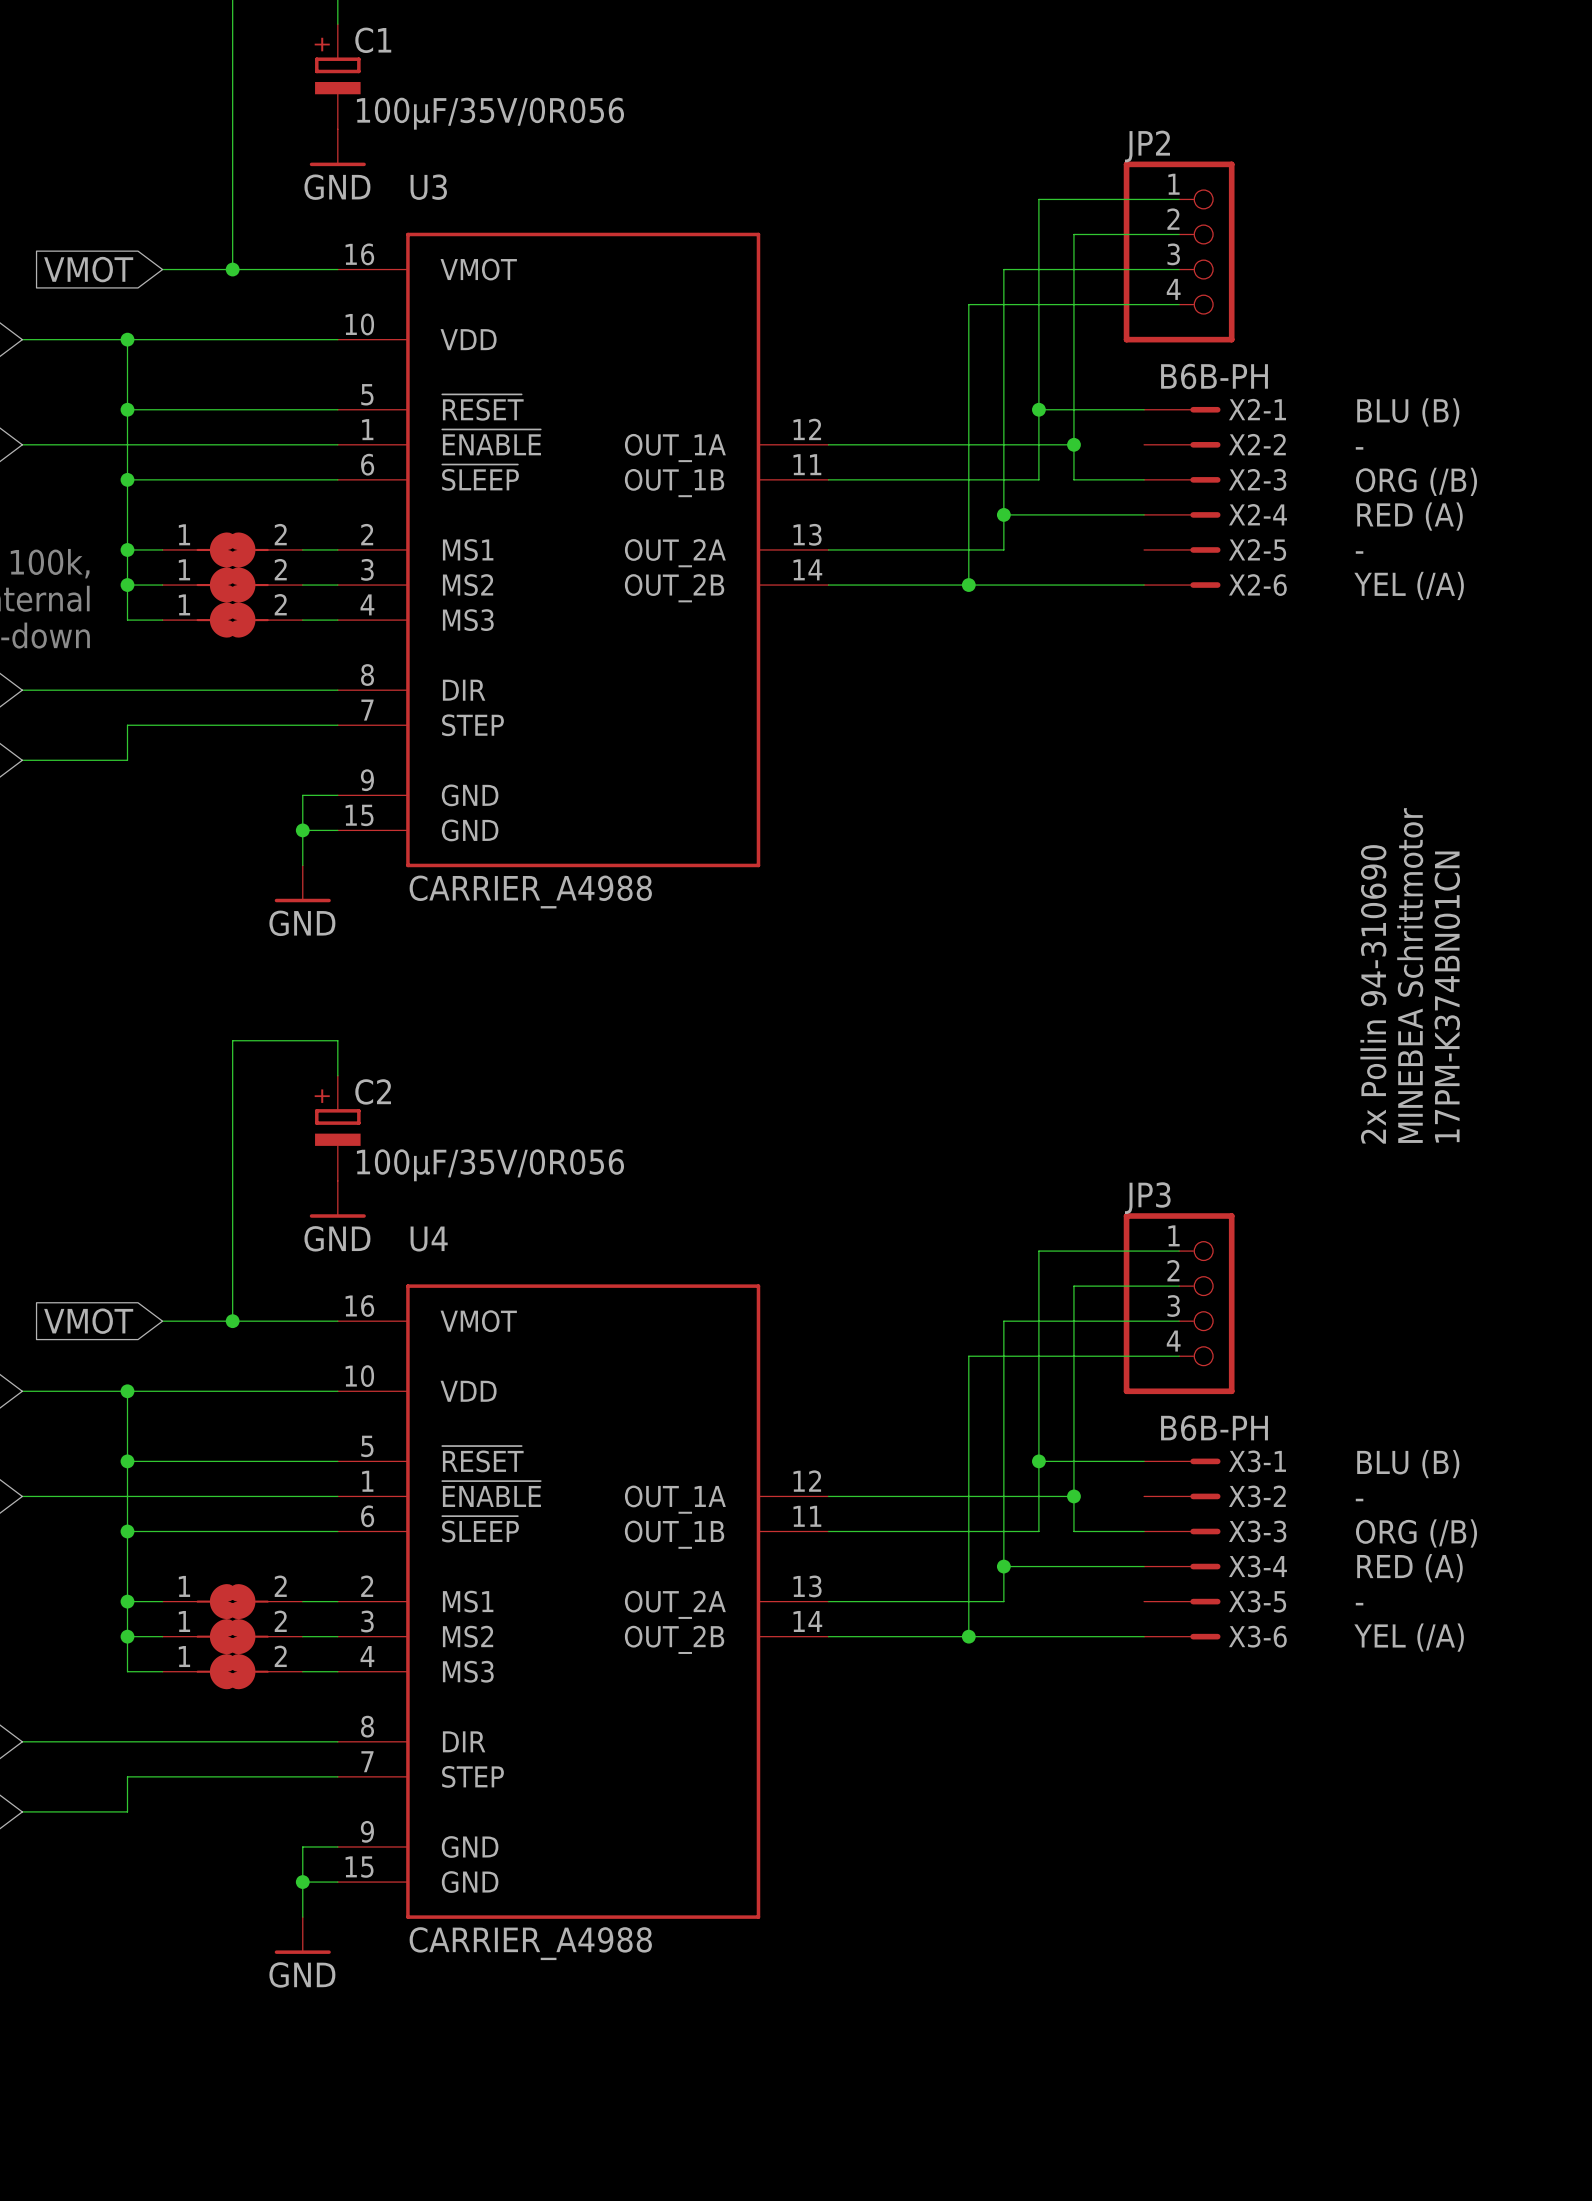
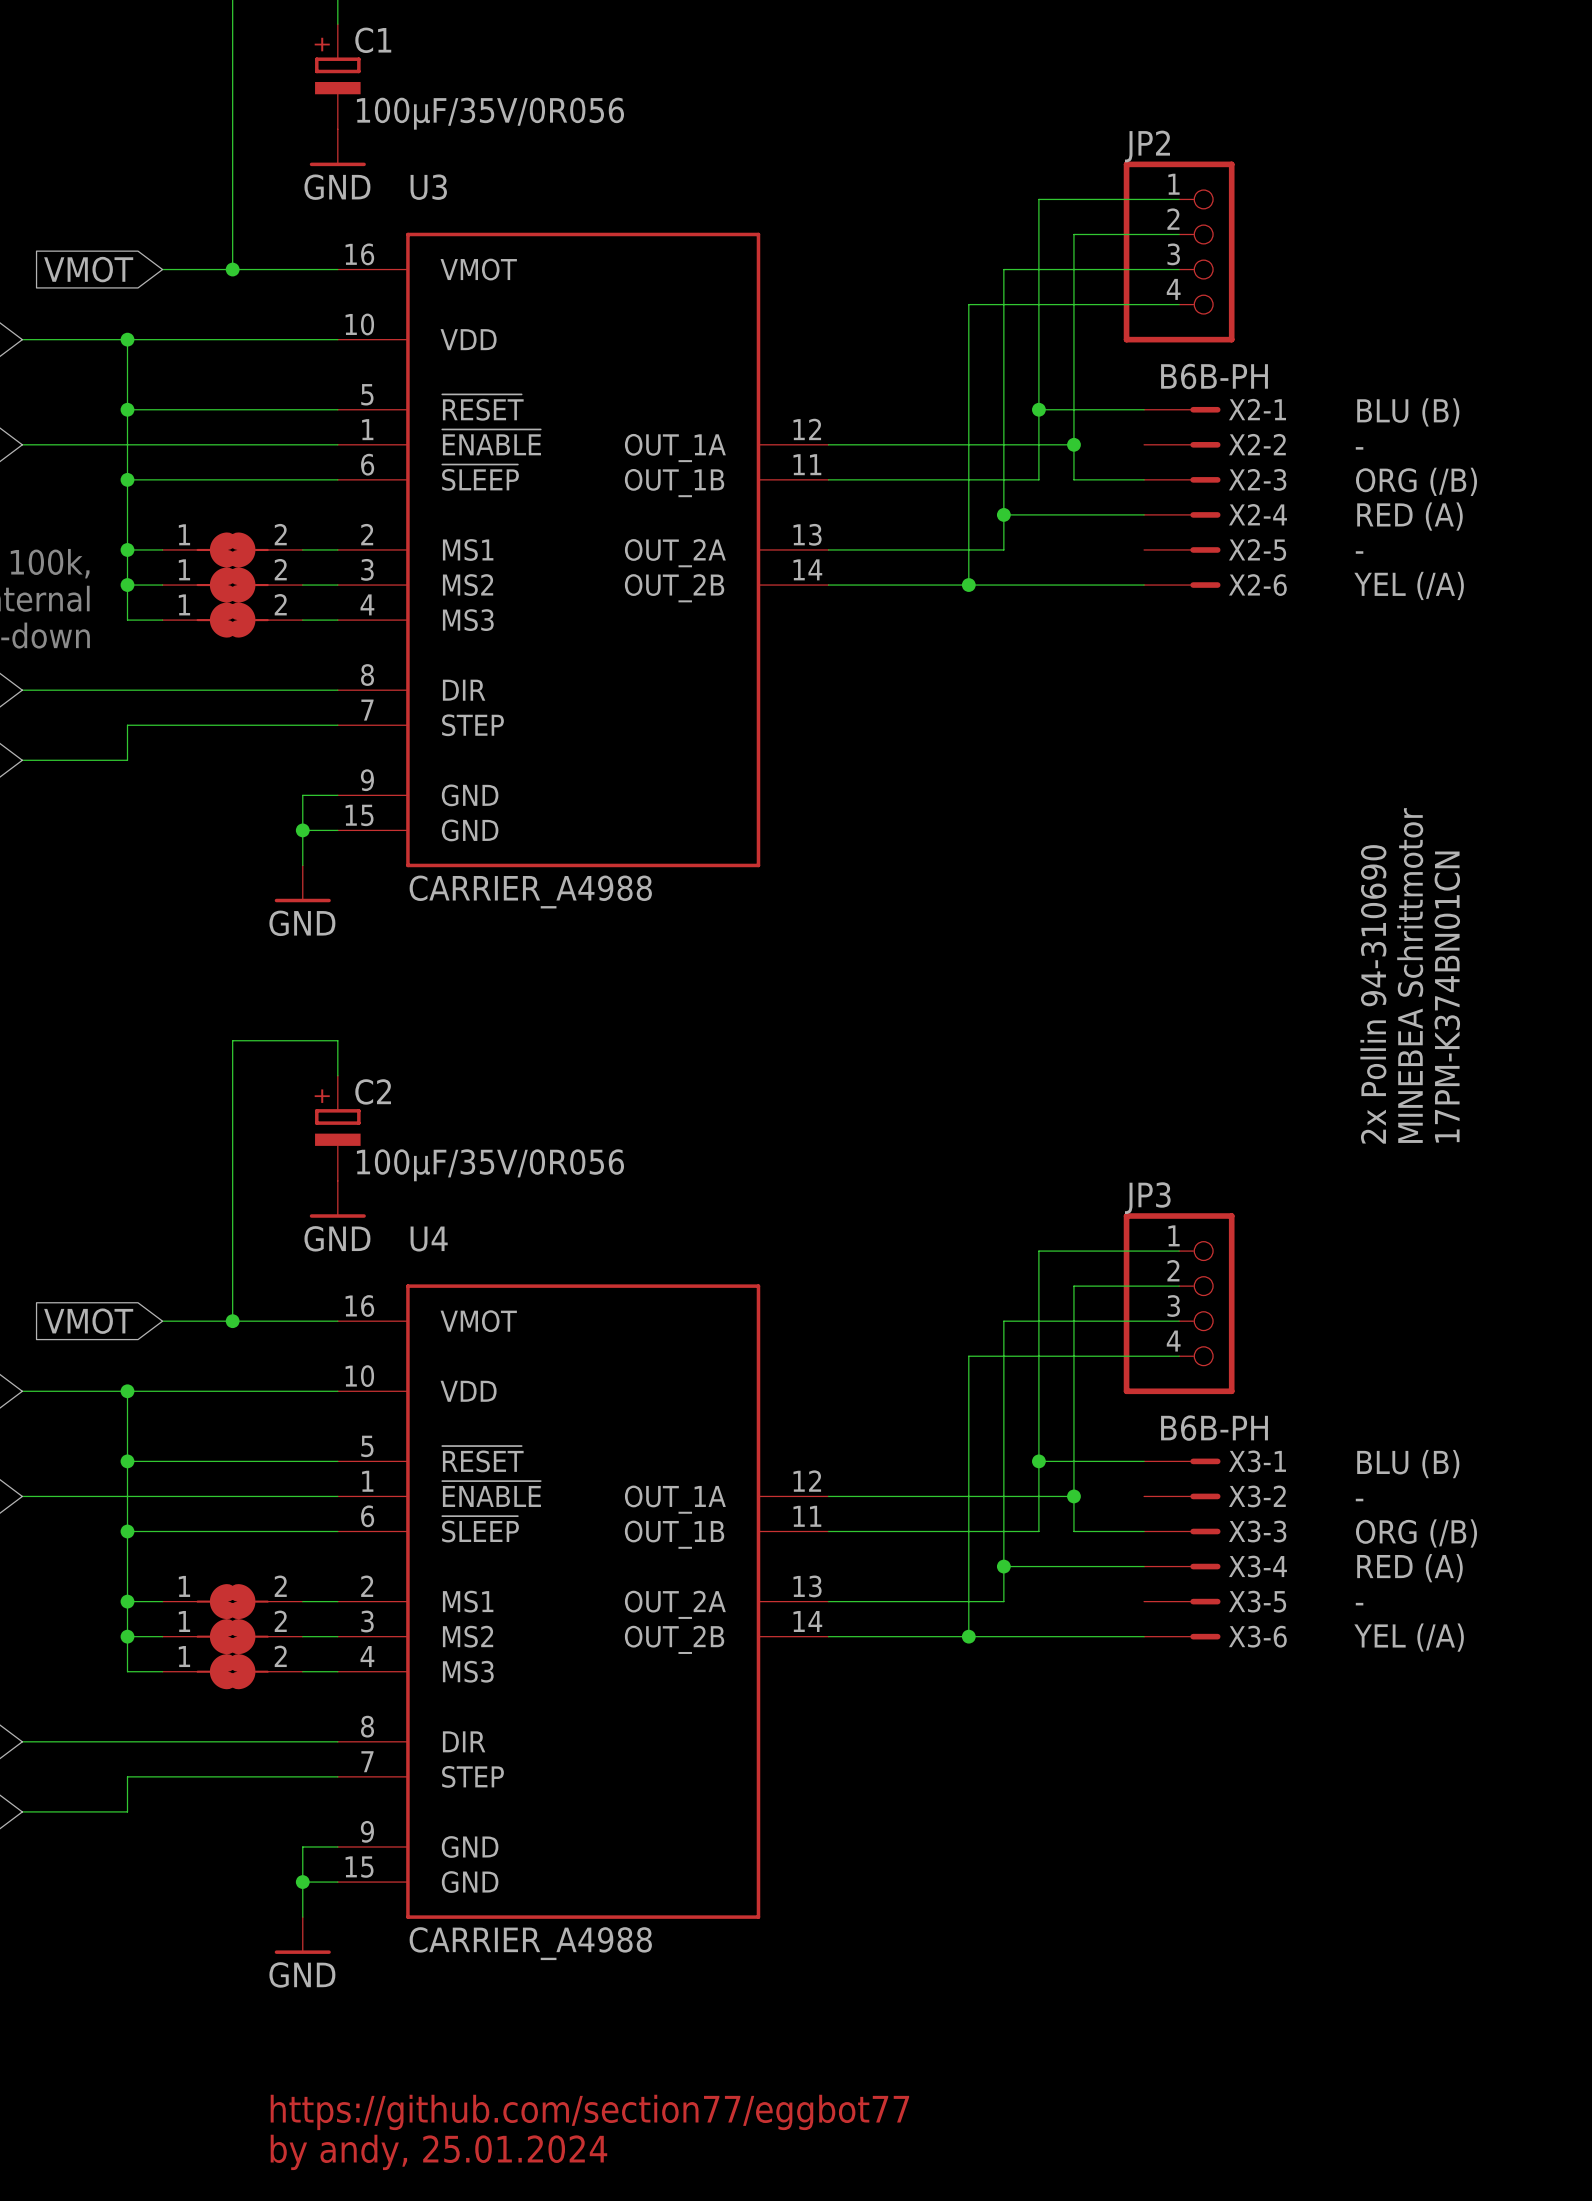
text: none -> https://github.com/section77/eggbot77 (589, 2112)
text: none -> by andy, 25.01.2024 (438, 2152)

